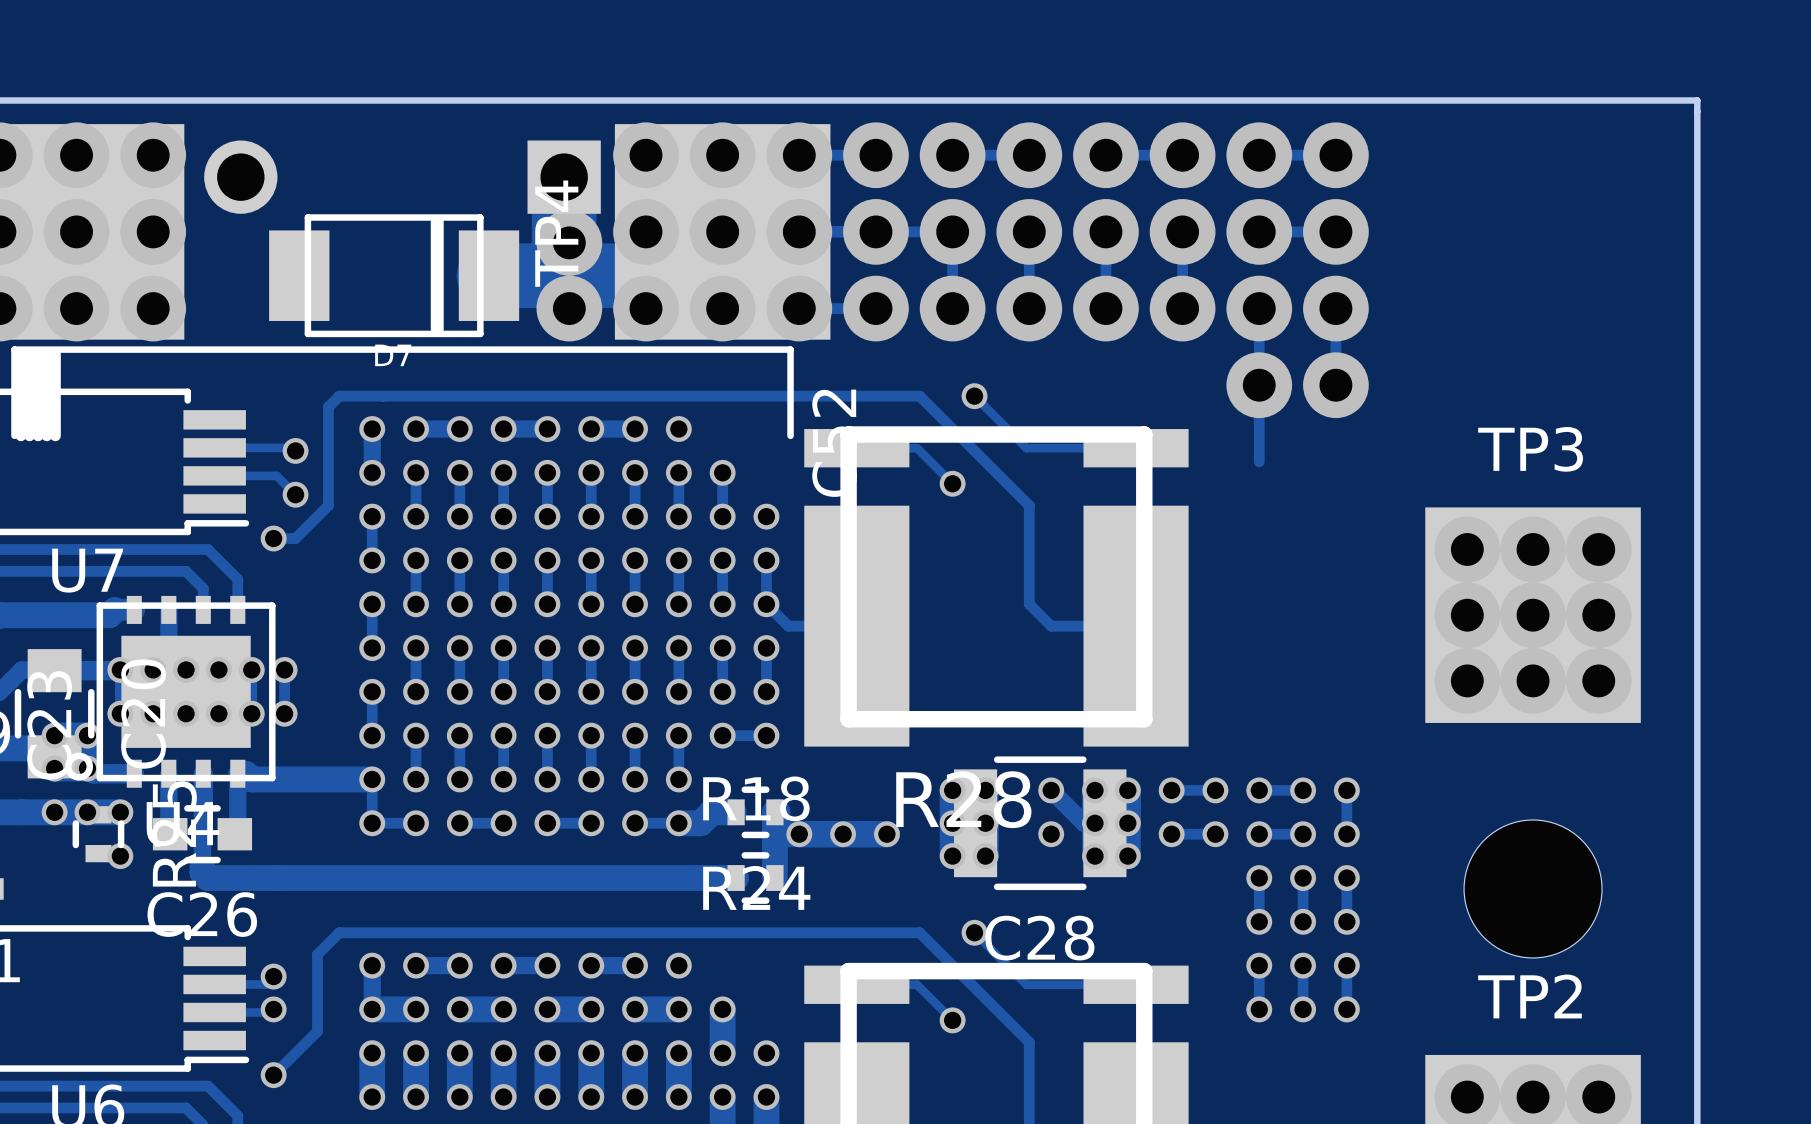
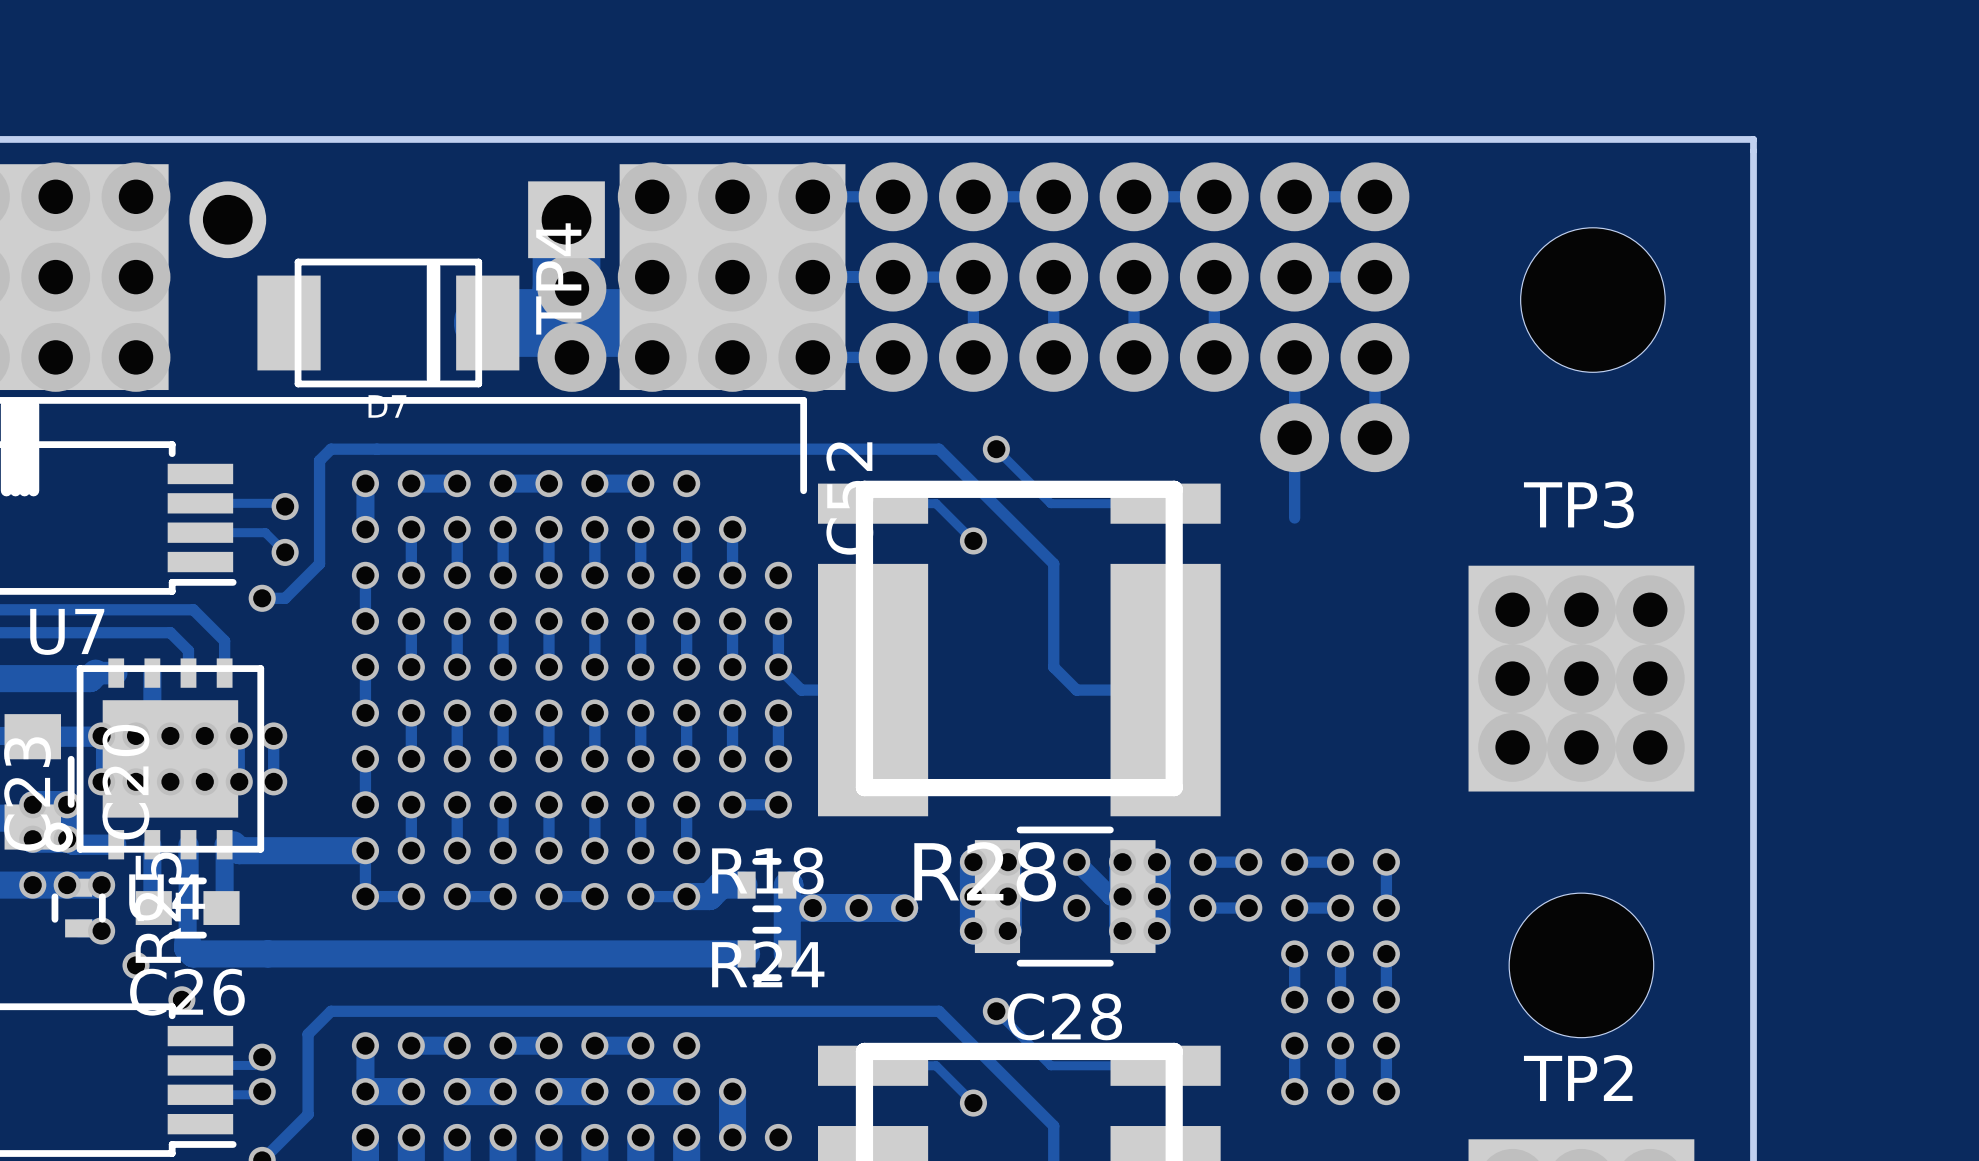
part: none -> (1592, 300)
via: none -> (136, 965)
via: none -> (181, 999)

